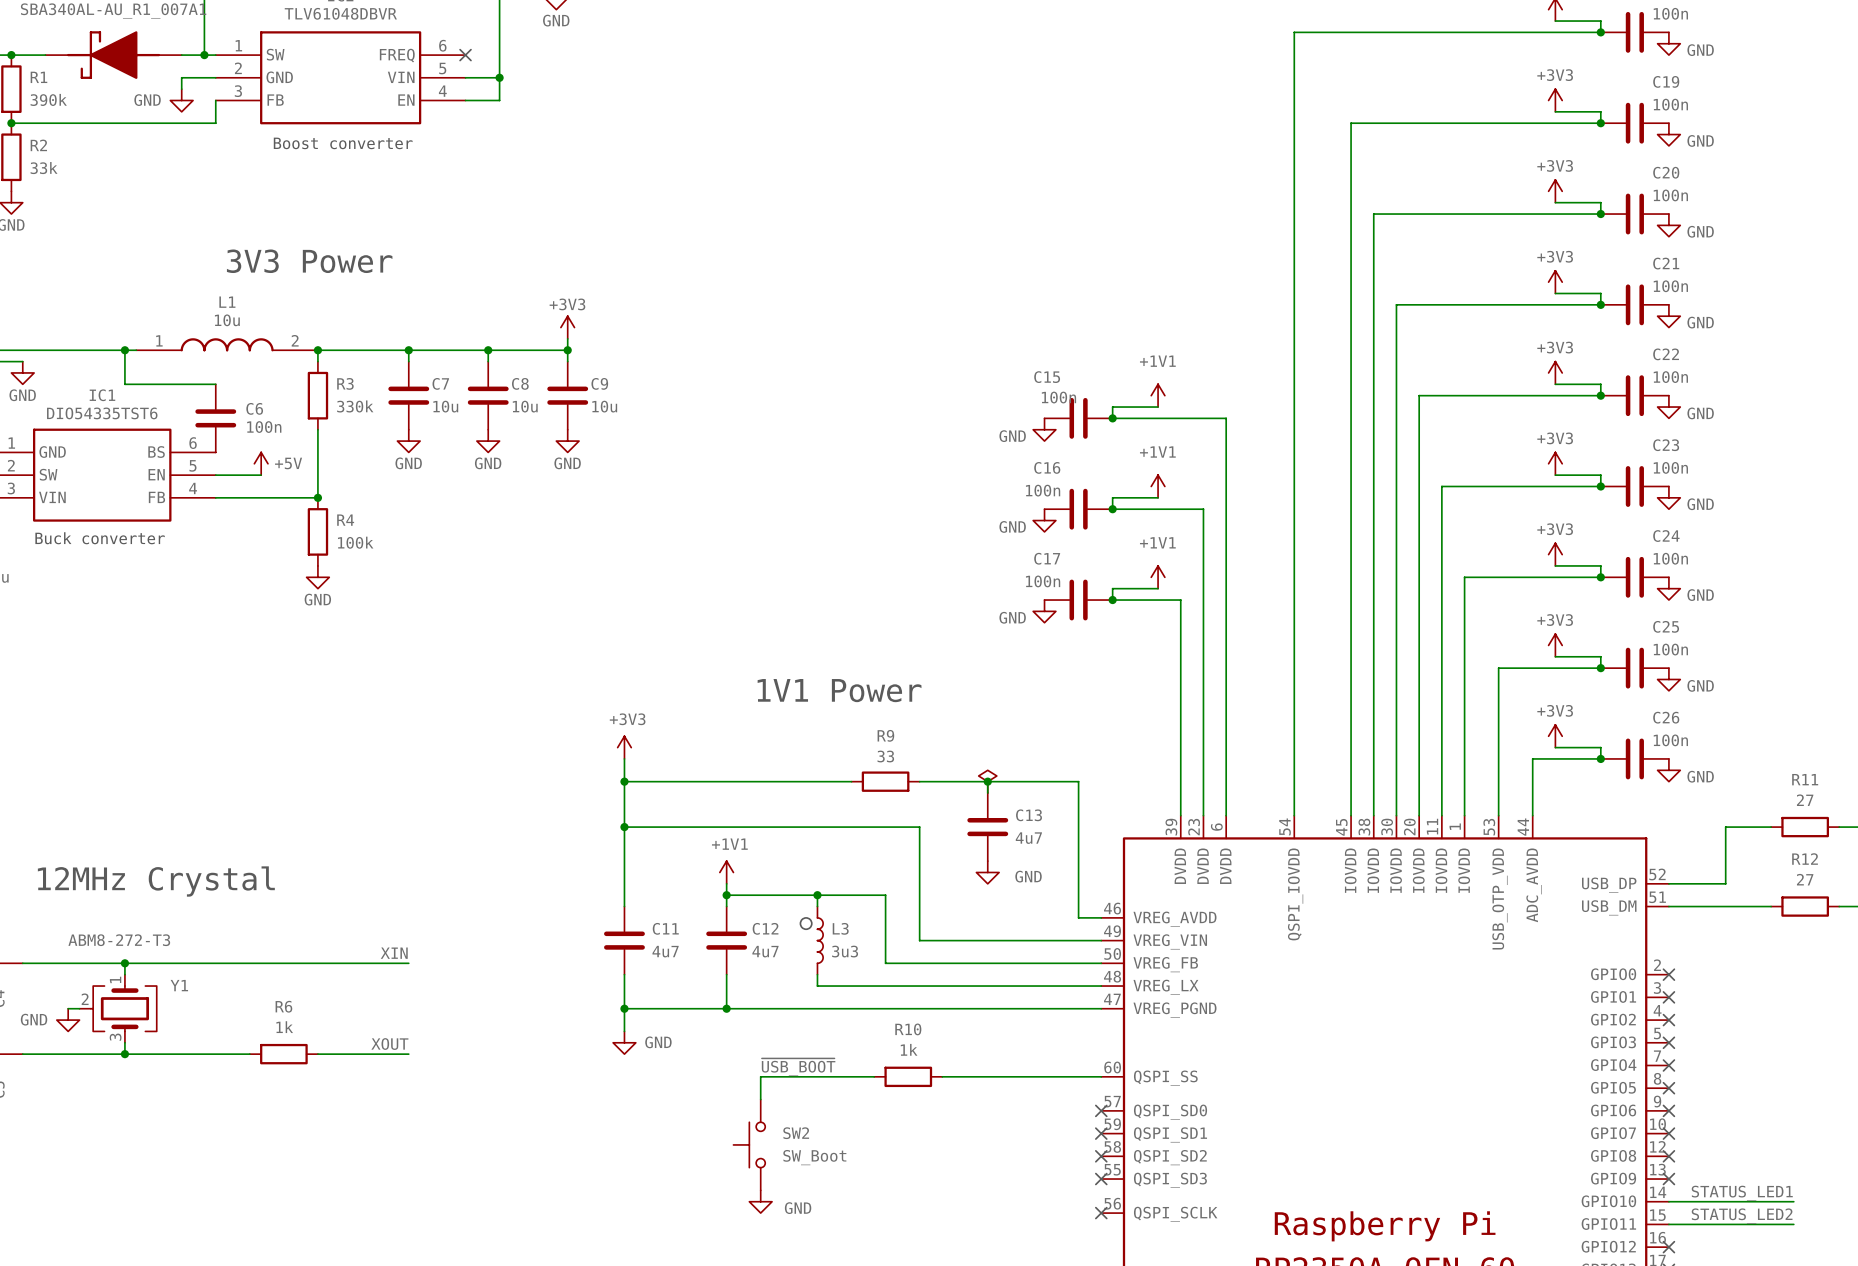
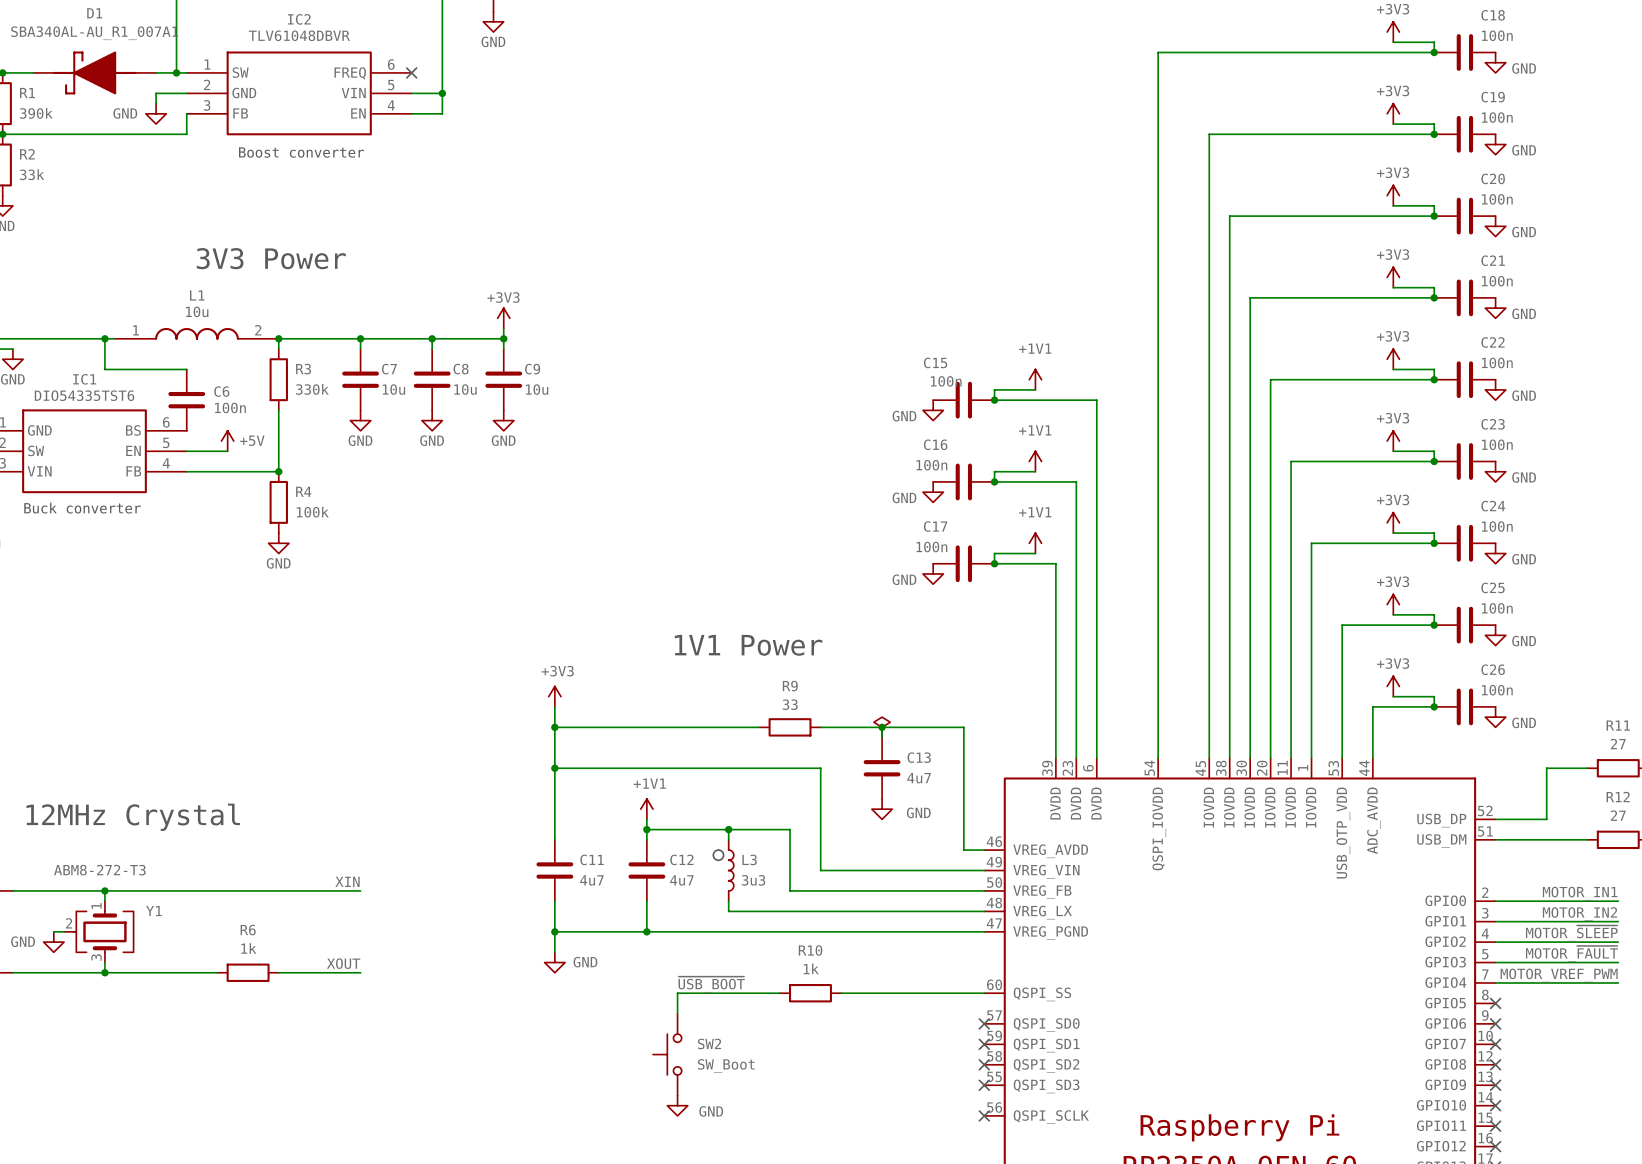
label: none -> MOTOR_IN1 (1580, 893)
wire: none -> (1495, 901) (1618, 901)
no-connect mark: (1668, 974) -> none
label: none -> MOTOR_IN2 (1579, 914)
wire: none -> (1495, 921) (1618, 921)
no-connect mark: (1668, 997) -> none
label: none -> MOTOR_~{SLEEP} (1571, 933)
wire: none -> (1495, 942) (1618, 942)
no-connect mark: (1668, 1020) -> none
label: none -> MOTOR_~{FAULT} (1571, 953)
wire: none -> (1495, 962) (1618, 962)
no-connect mark: (1668, 1042) -> none
label: none -> MOTOR_VREF_PWM (1559, 975)
wire: none -> (1495, 982) (1618, 982)
no-connect mark: (1668, 1065) -> none
label: STATUS_LED1 (1742, 1193) -> none
wire: (1668, 1201) (1793, 1201) -> none
no-connect mark: none -> (1495, 1105)
label: STATUS_LED2 (1742, 1216) -> none
wire: (1668, 1224) (1793, 1224) -> none
no-connect mark: none -> (1495, 1126)

